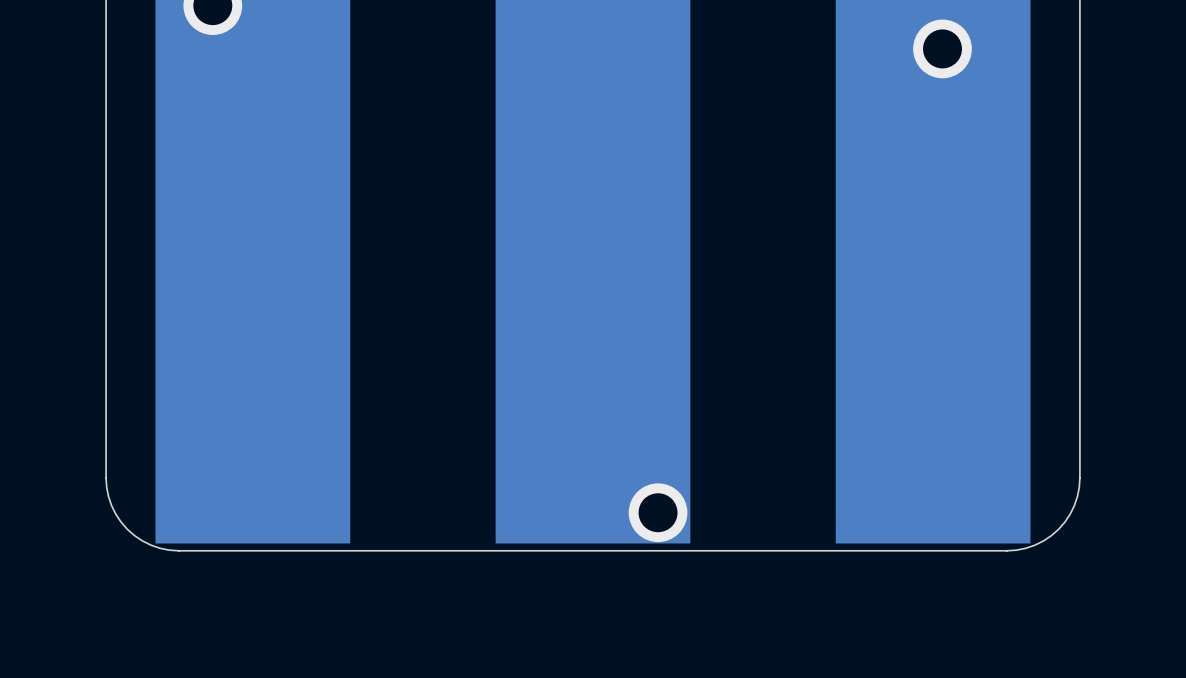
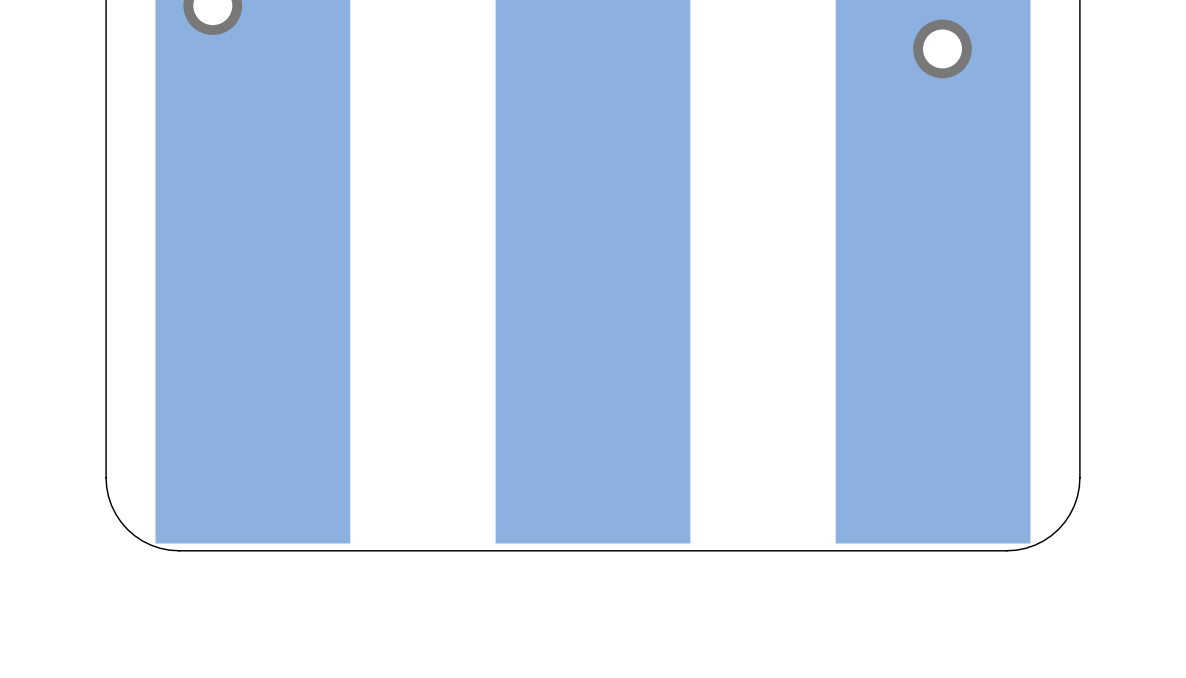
via: (658, 512) -> none

